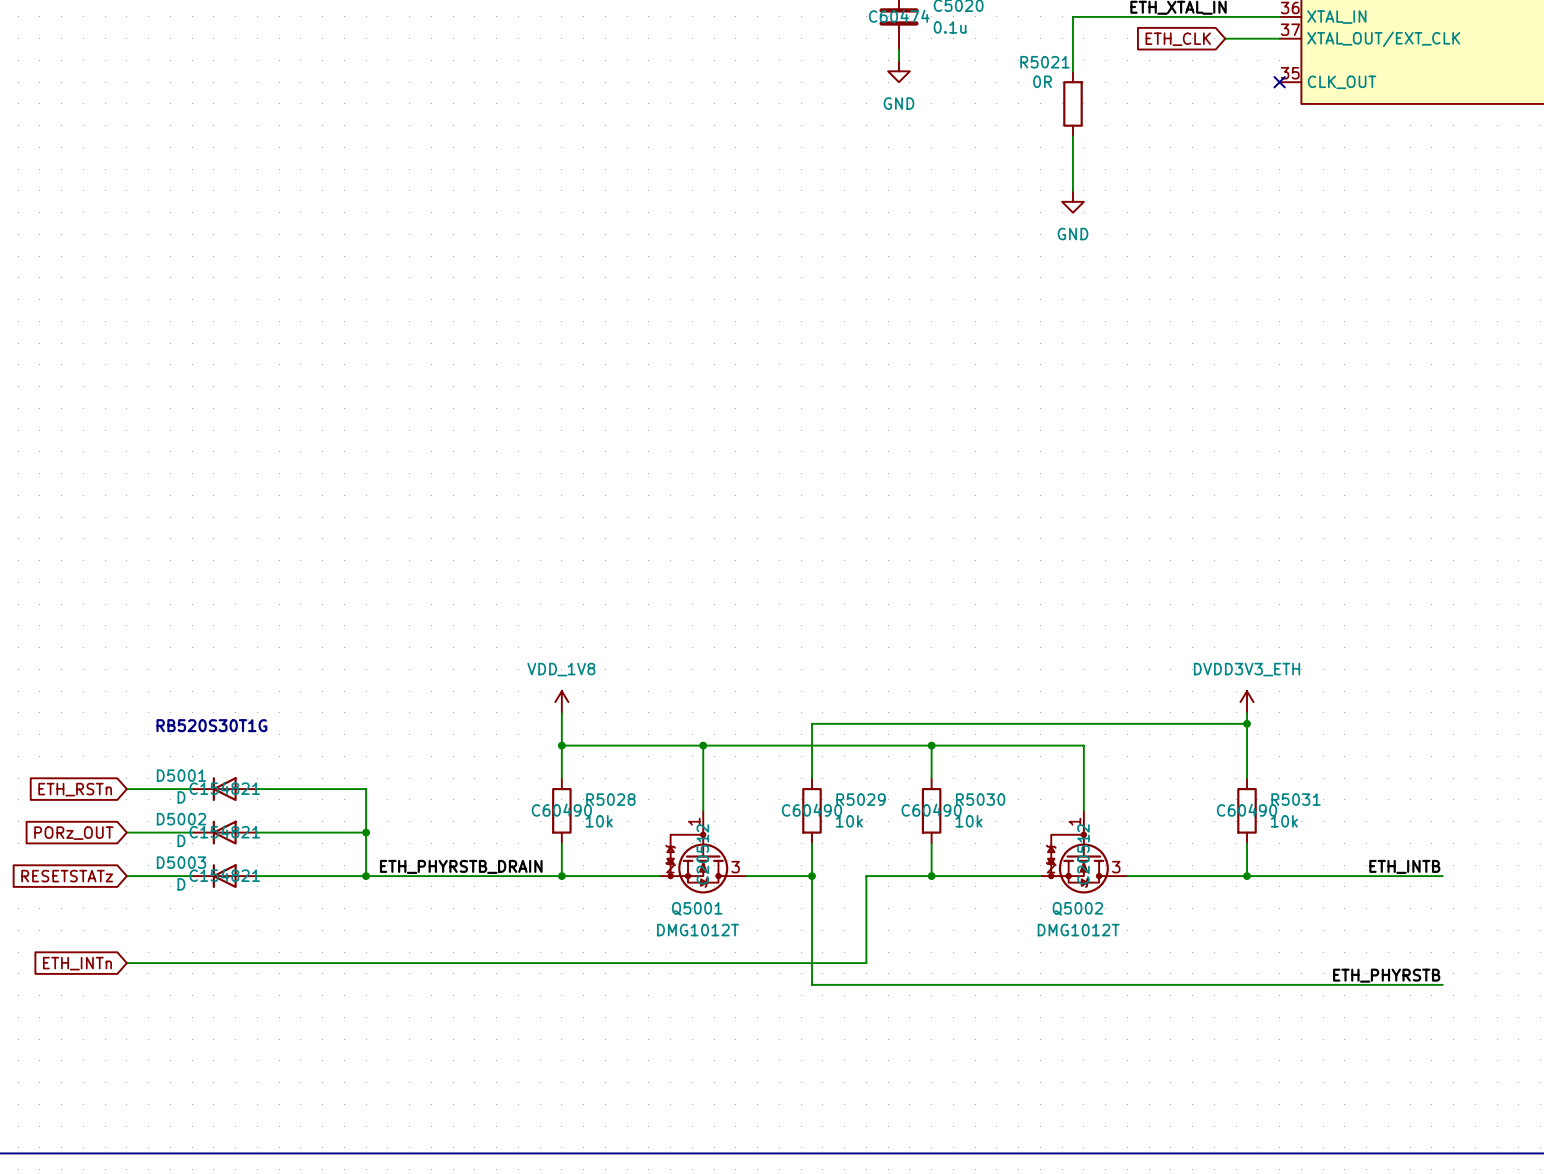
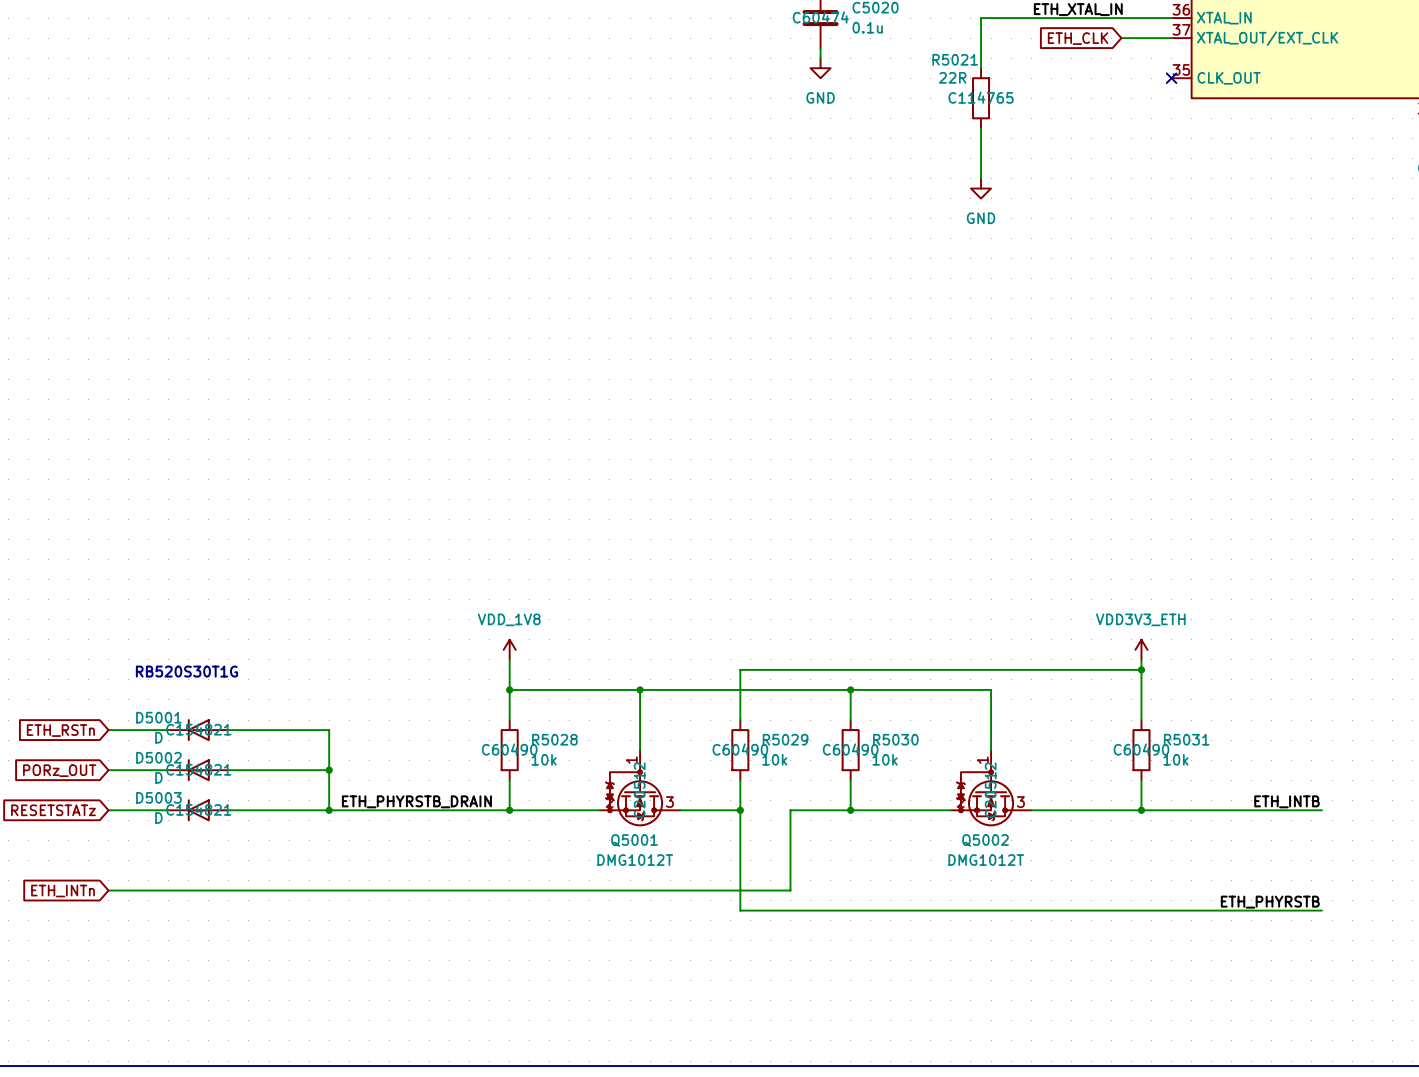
R5021 value: 0R (1042, 81) -> 22R (952, 77)
R5021 text: none -> C114765 (981, 97)
power symbol: DVDD3V3_ETH (1247, 702) -> VDD3V3_ETH (1141, 649)

